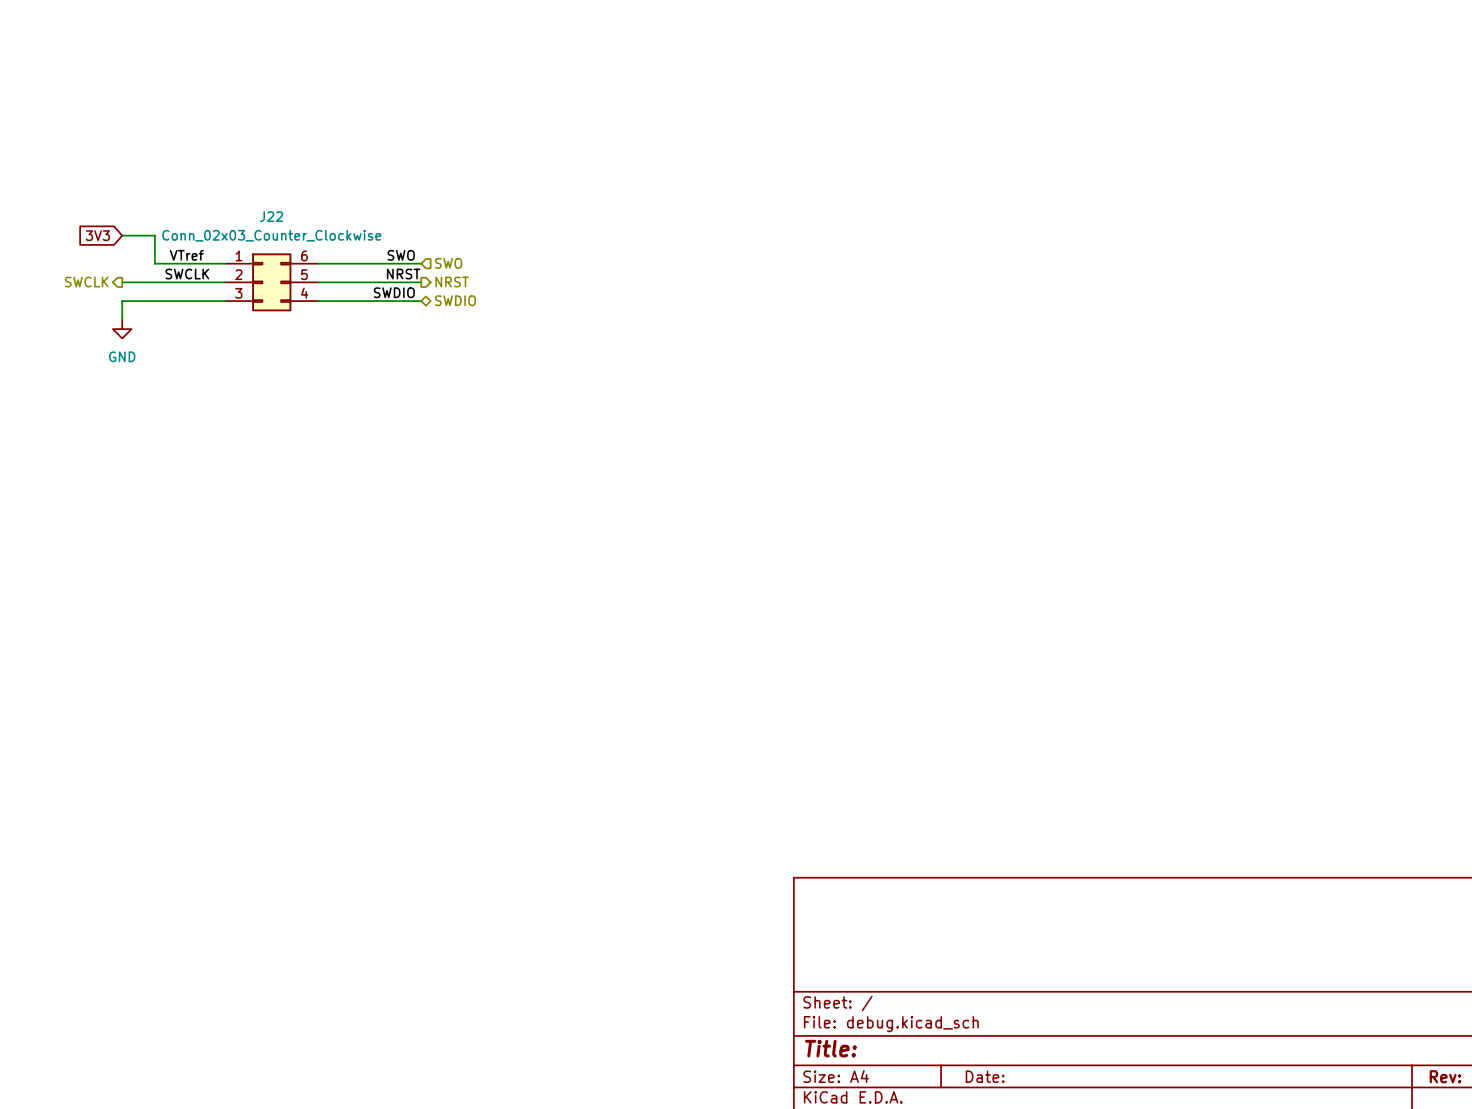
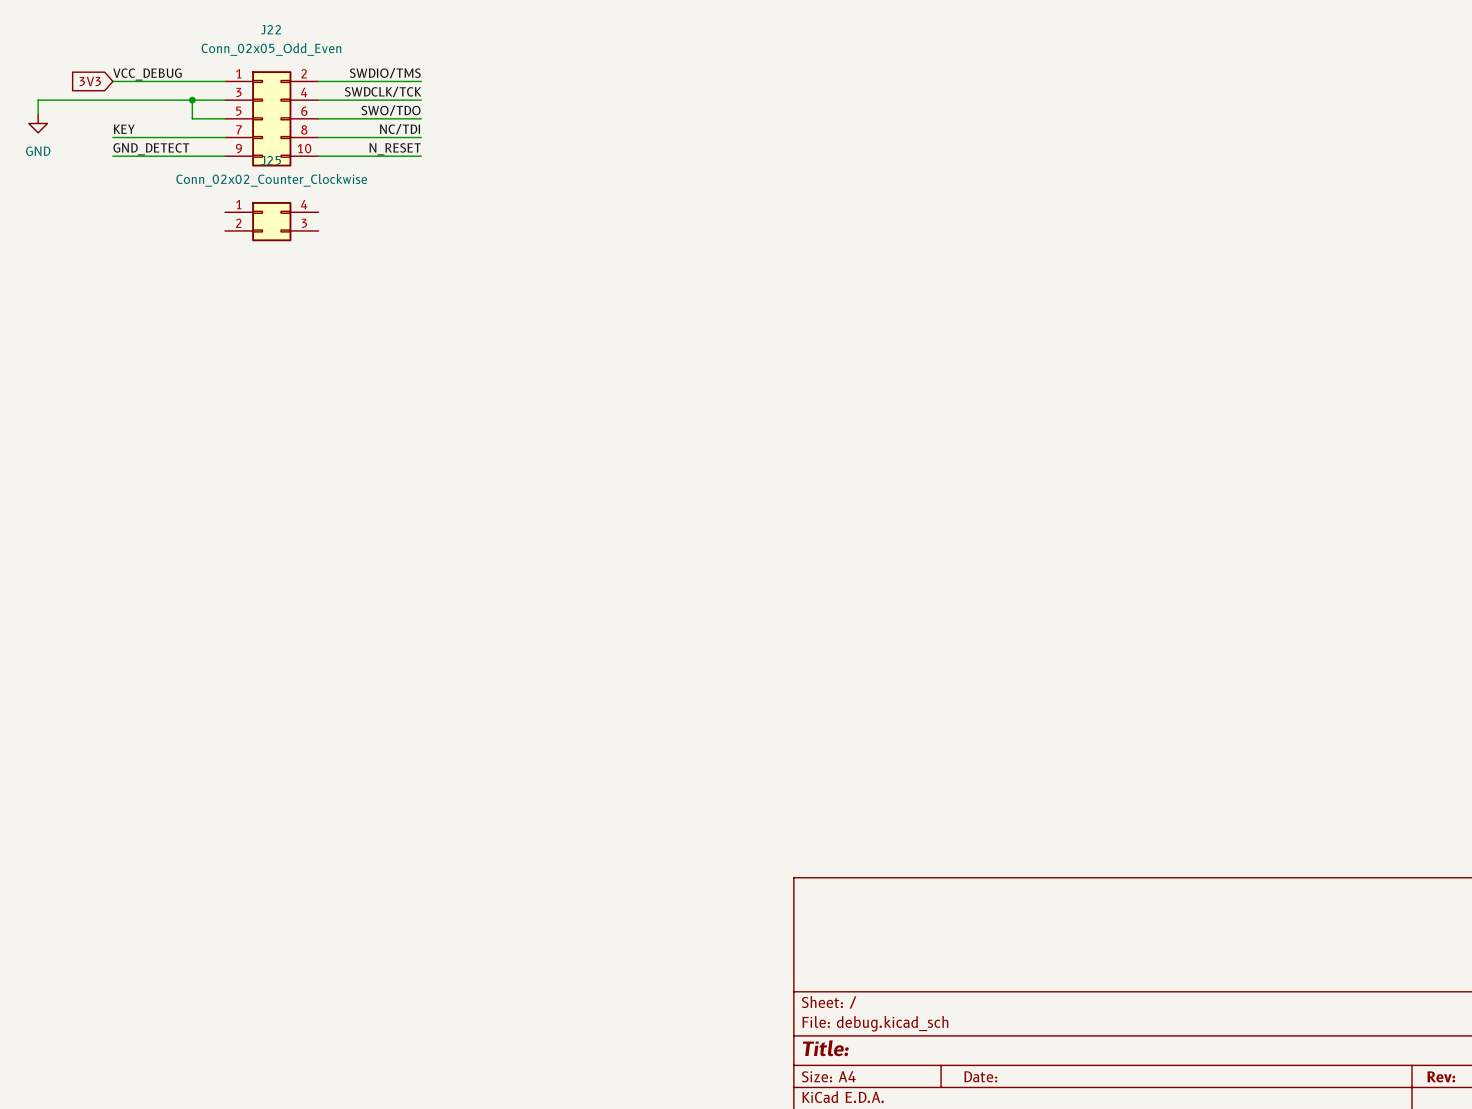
label: none -> VCC_DEBUG (147, 74)
label: none -> SWDIO/TMS (385, 73)
wire: none -> (112, 81) (225, 81)
wire: none -> (318, 81) (421, 81)
label: none -> SWDCLK/TCK (383, 91)
wire: none -> (192, 100) (192, 118) (225, 118)
junction: none -> (192, 100)
wire: none -> (225, 100) (38, 100) (38, 114)
wire: none -> (318, 100) (421, 100)
label: none -> SWO/TDO (391, 110)
power symbol: none -> GND (38, 123)
label: none -> KEY (124, 129)
label: none -> NC/TDI (399, 129)
wire: none -> (112, 137) (225, 137)
label: none -> GND_DETECT (151, 149)
label: none -> N_RESET (395, 149)
wire: none -> (112, 156) (225, 156)
J22 name position: J22 (271, 216) -> J22 (271, 29)
J25: none -> Conn_02x02_Counter_Clockwise (271, 221)
global label position: 3V3 (97, 235) -> 3V3 (90, 81)
wire: (122, 235) (154, 235) (154, 263) (225, 263) -> none
J22 value: Conn_02x03_Counter_Clockwise (271, 235) -> Conn_02x05_Odd_Even (271, 49)
J22 symbol: [225, 253, 319, 312] -> [225, 71, 319, 167]
label: VTref (186, 255) -> none
label: SWO (401, 255) -> none
wire: (318, 263) (421, 263) -> (318, 118) (421, 118)
hierarchical label: SWO (448, 263) -> none
label: SWCLK (187, 274) -> none
label: NRST (403, 274) -> none
hierarchical label: SWCLK (86, 282) -> none
wire: (122, 282) (225, 282) -> none
wire: (318, 282) (421, 282) -> (318, 137) (421, 137)
hierarchical label: NRST (452, 282) -> none
label: SWDIO (394, 292) -> none
hierarchical label: SWDIO (455, 300) -> none
wire: (225, 301) (122, 301) (122, 319) -> none
wire: (318, 301) (421, 301) -> (318, 156) (421, 156)
power symbol: GND (122, 329) -> none

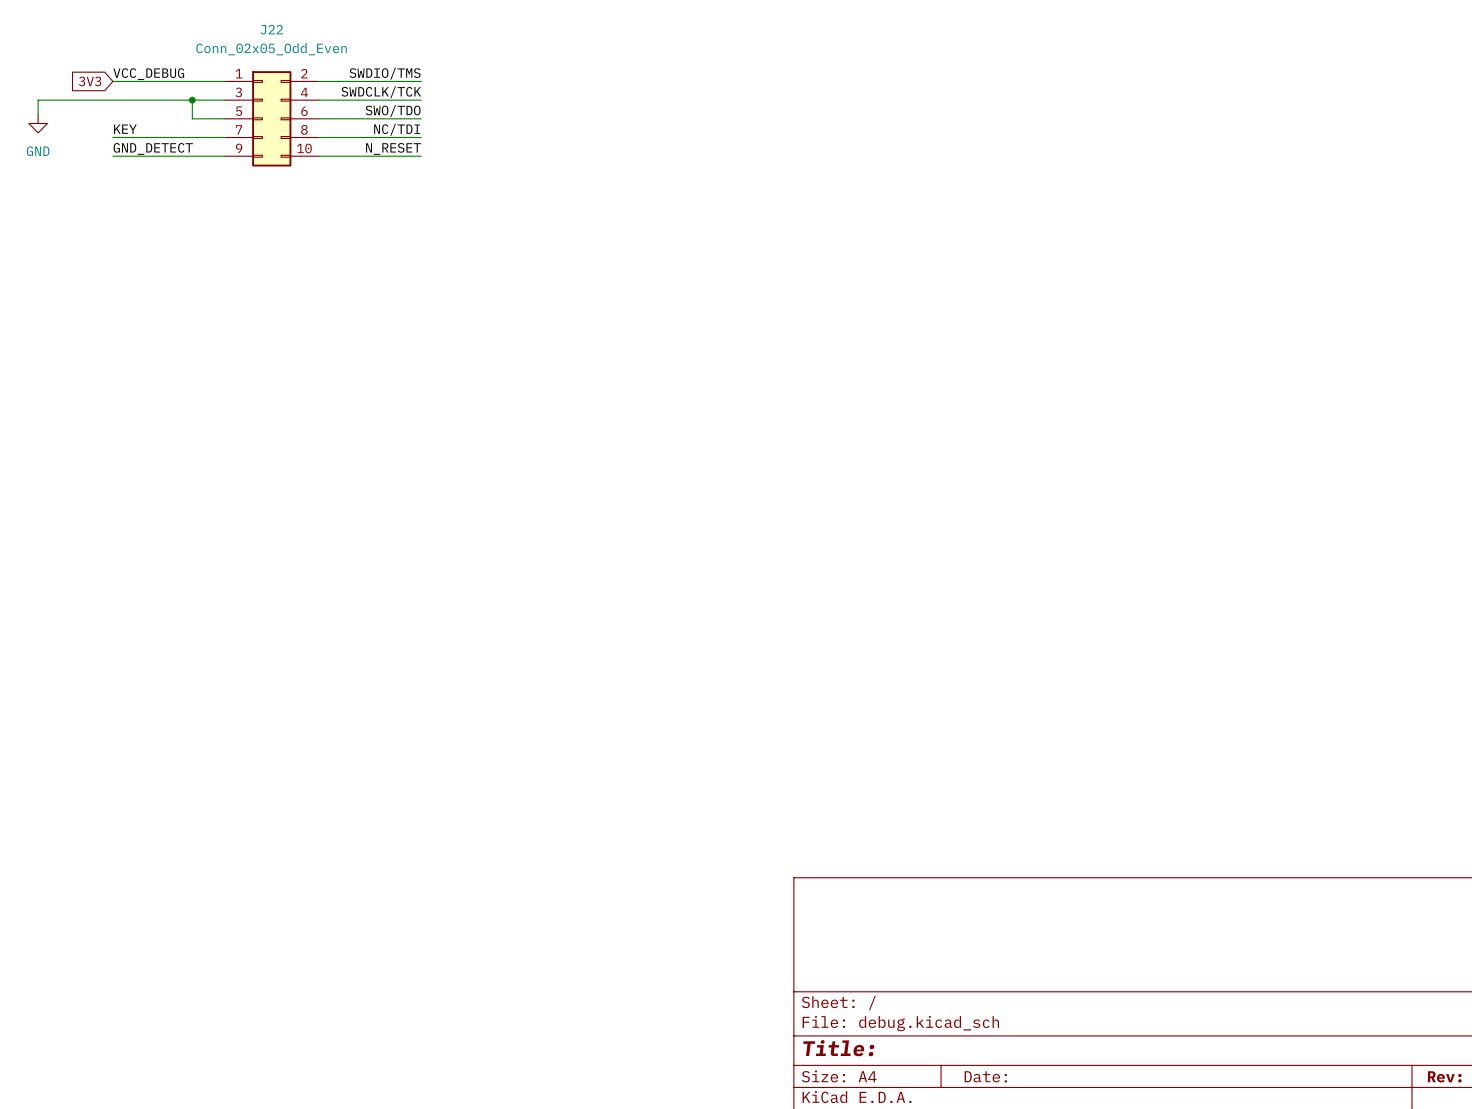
J25: Conn_02x02_Counter_Clockwise (271, 221) -> none

